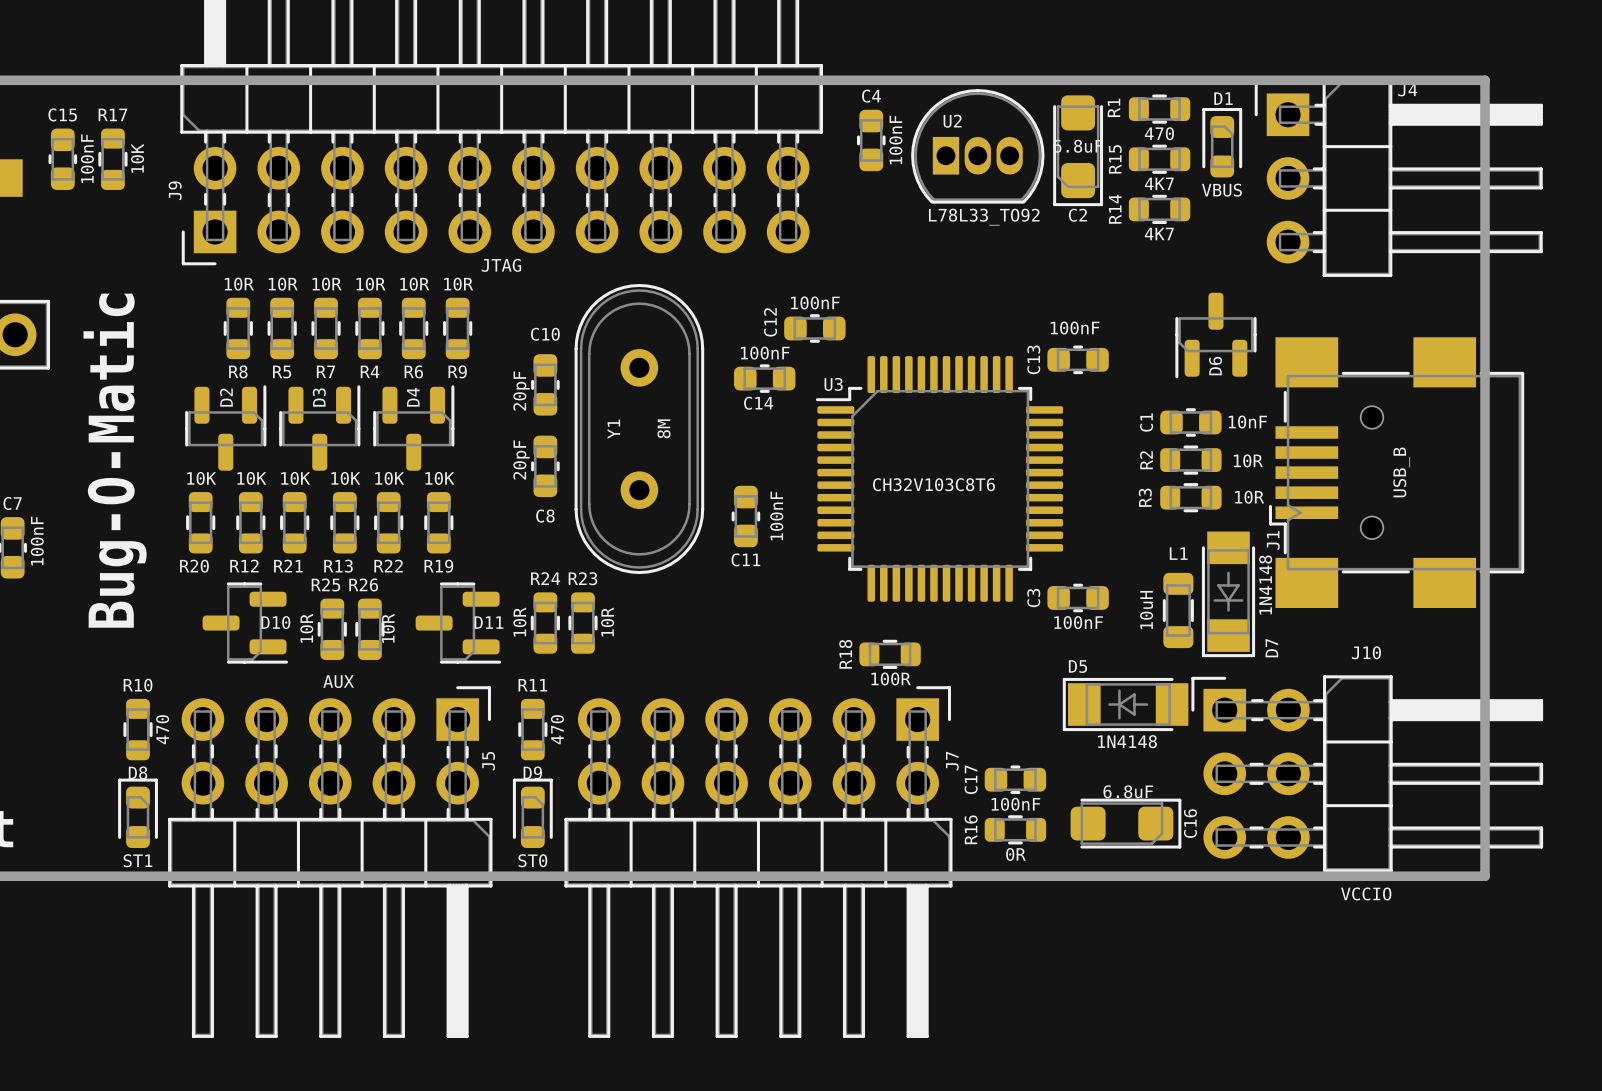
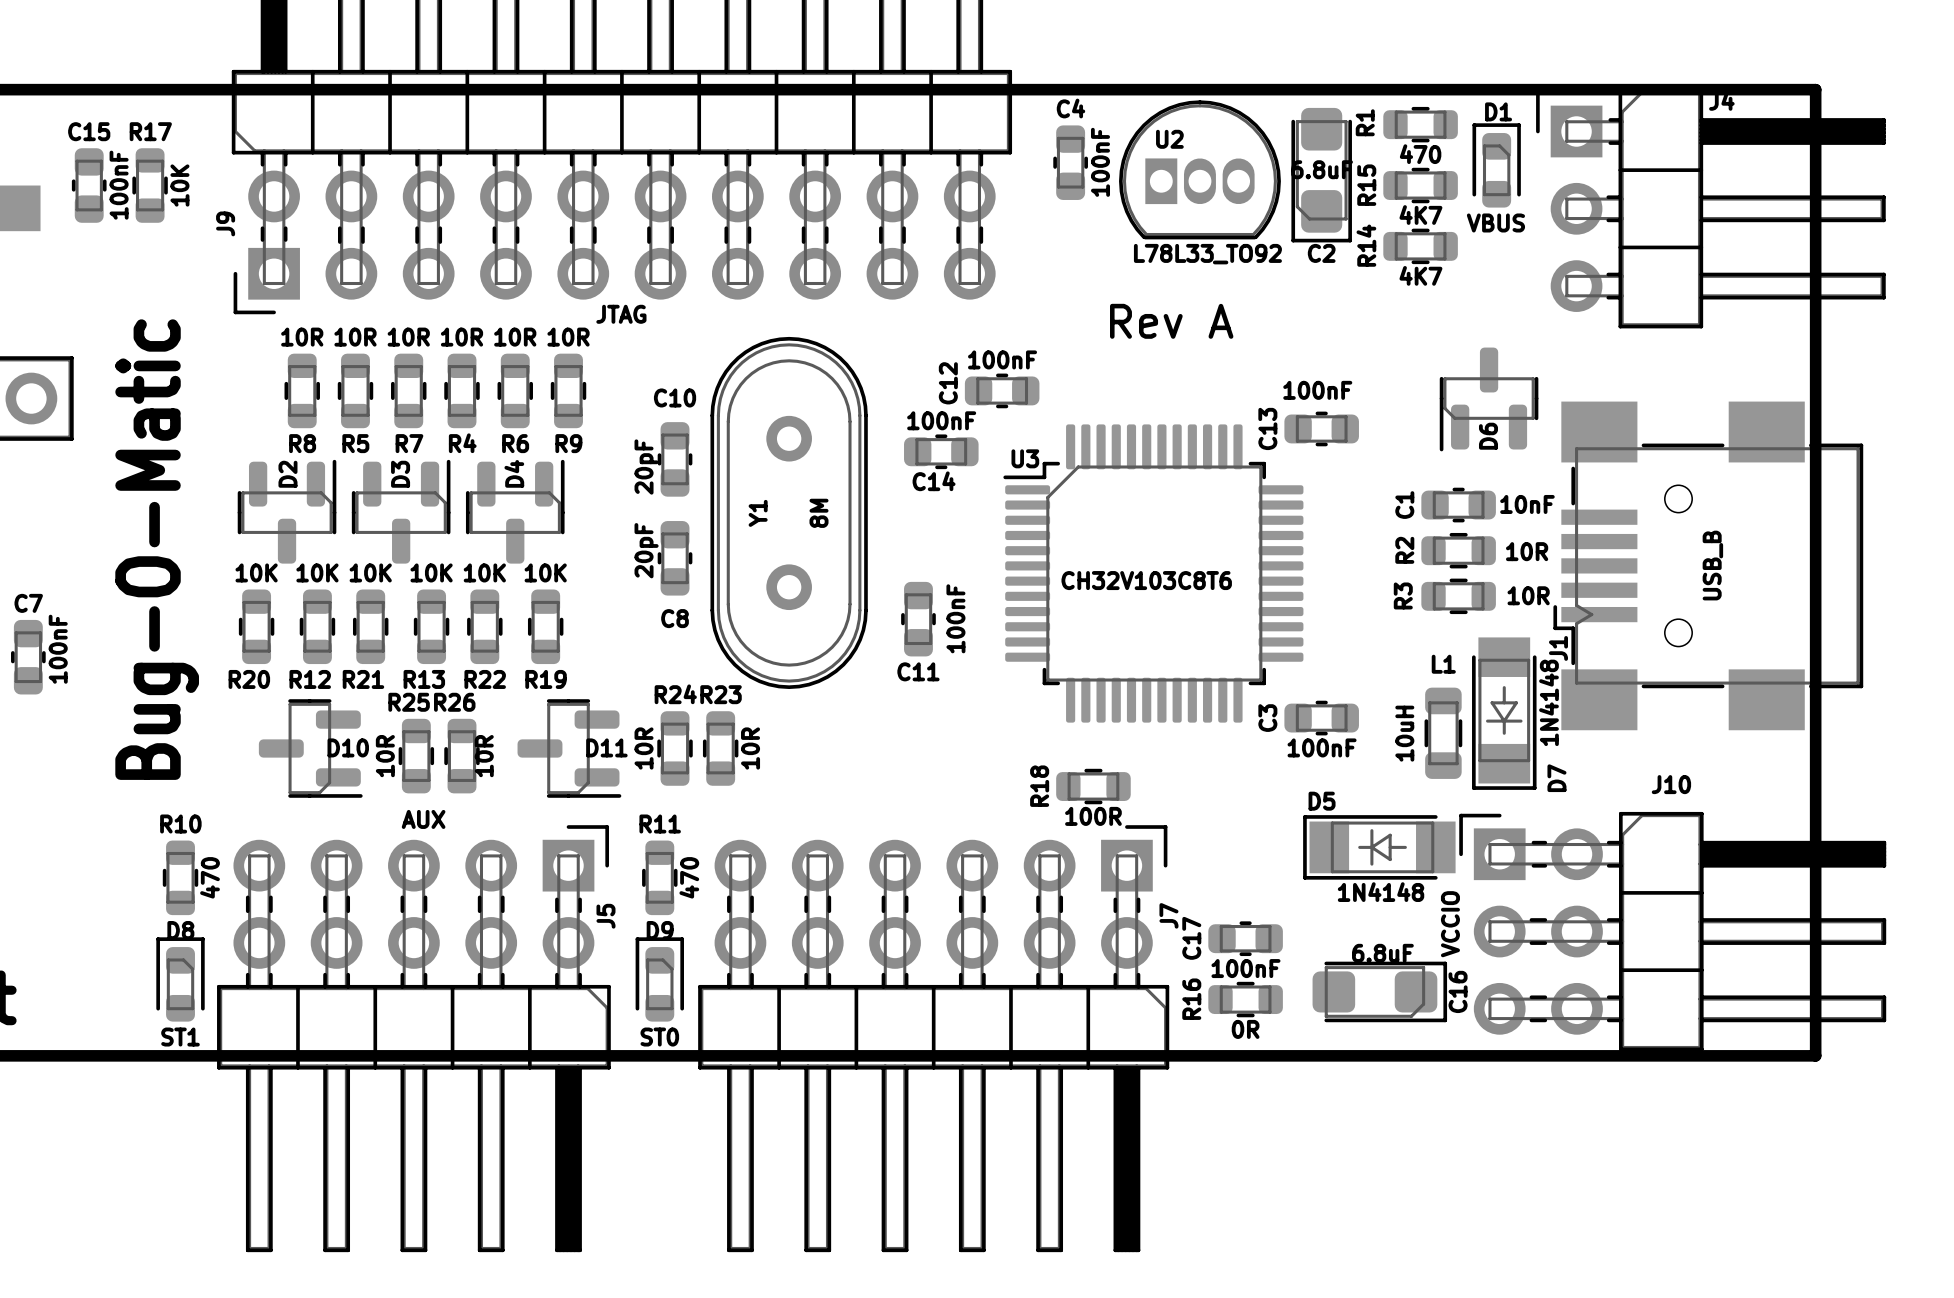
text: none -> Rev A (1171, 321)
J10 value rotation: 0° (1366, 893) -> 90° counterclockwise (1450, 924)
J10 value position: VCCIO (1366, 893) -> VCCIO (1450, 924)

